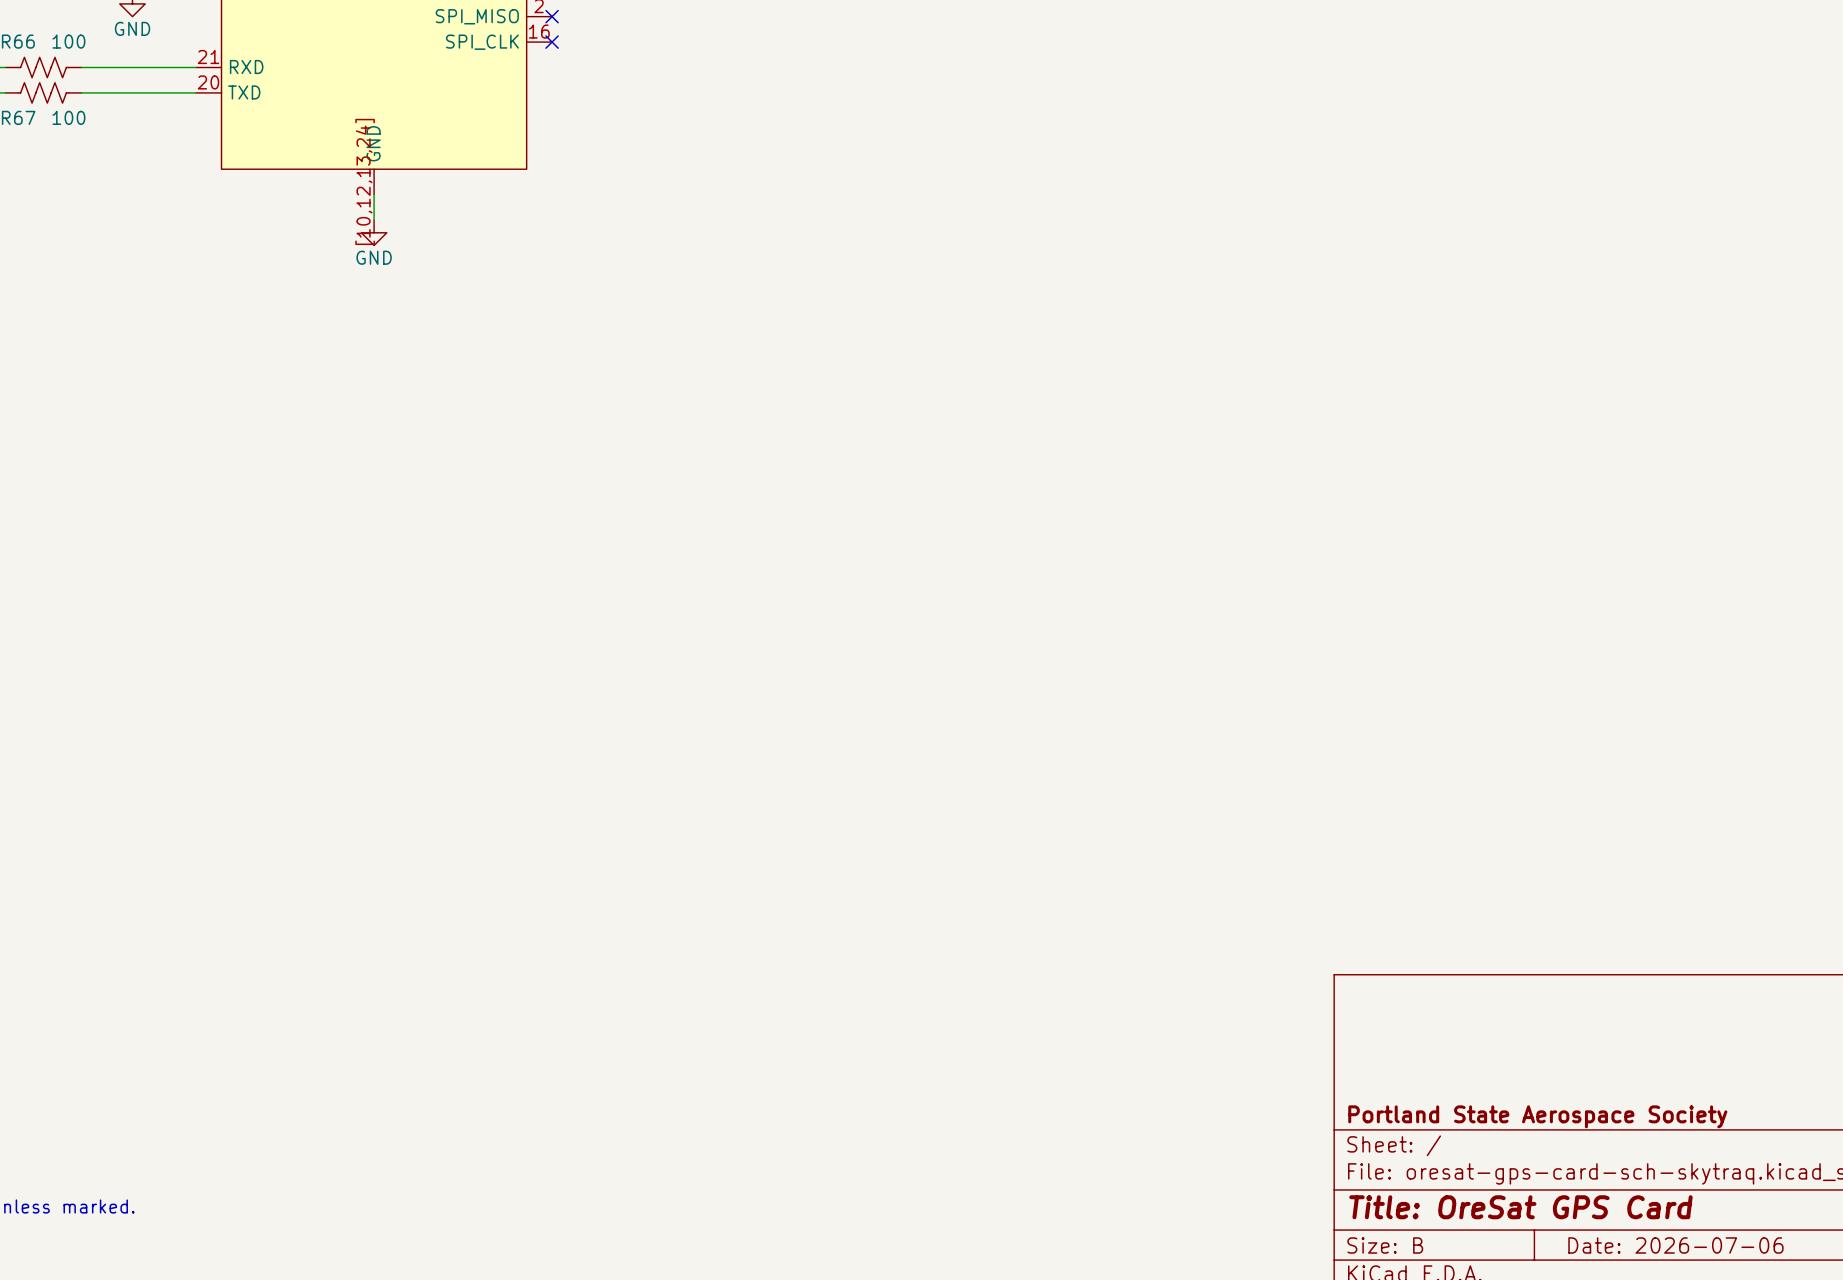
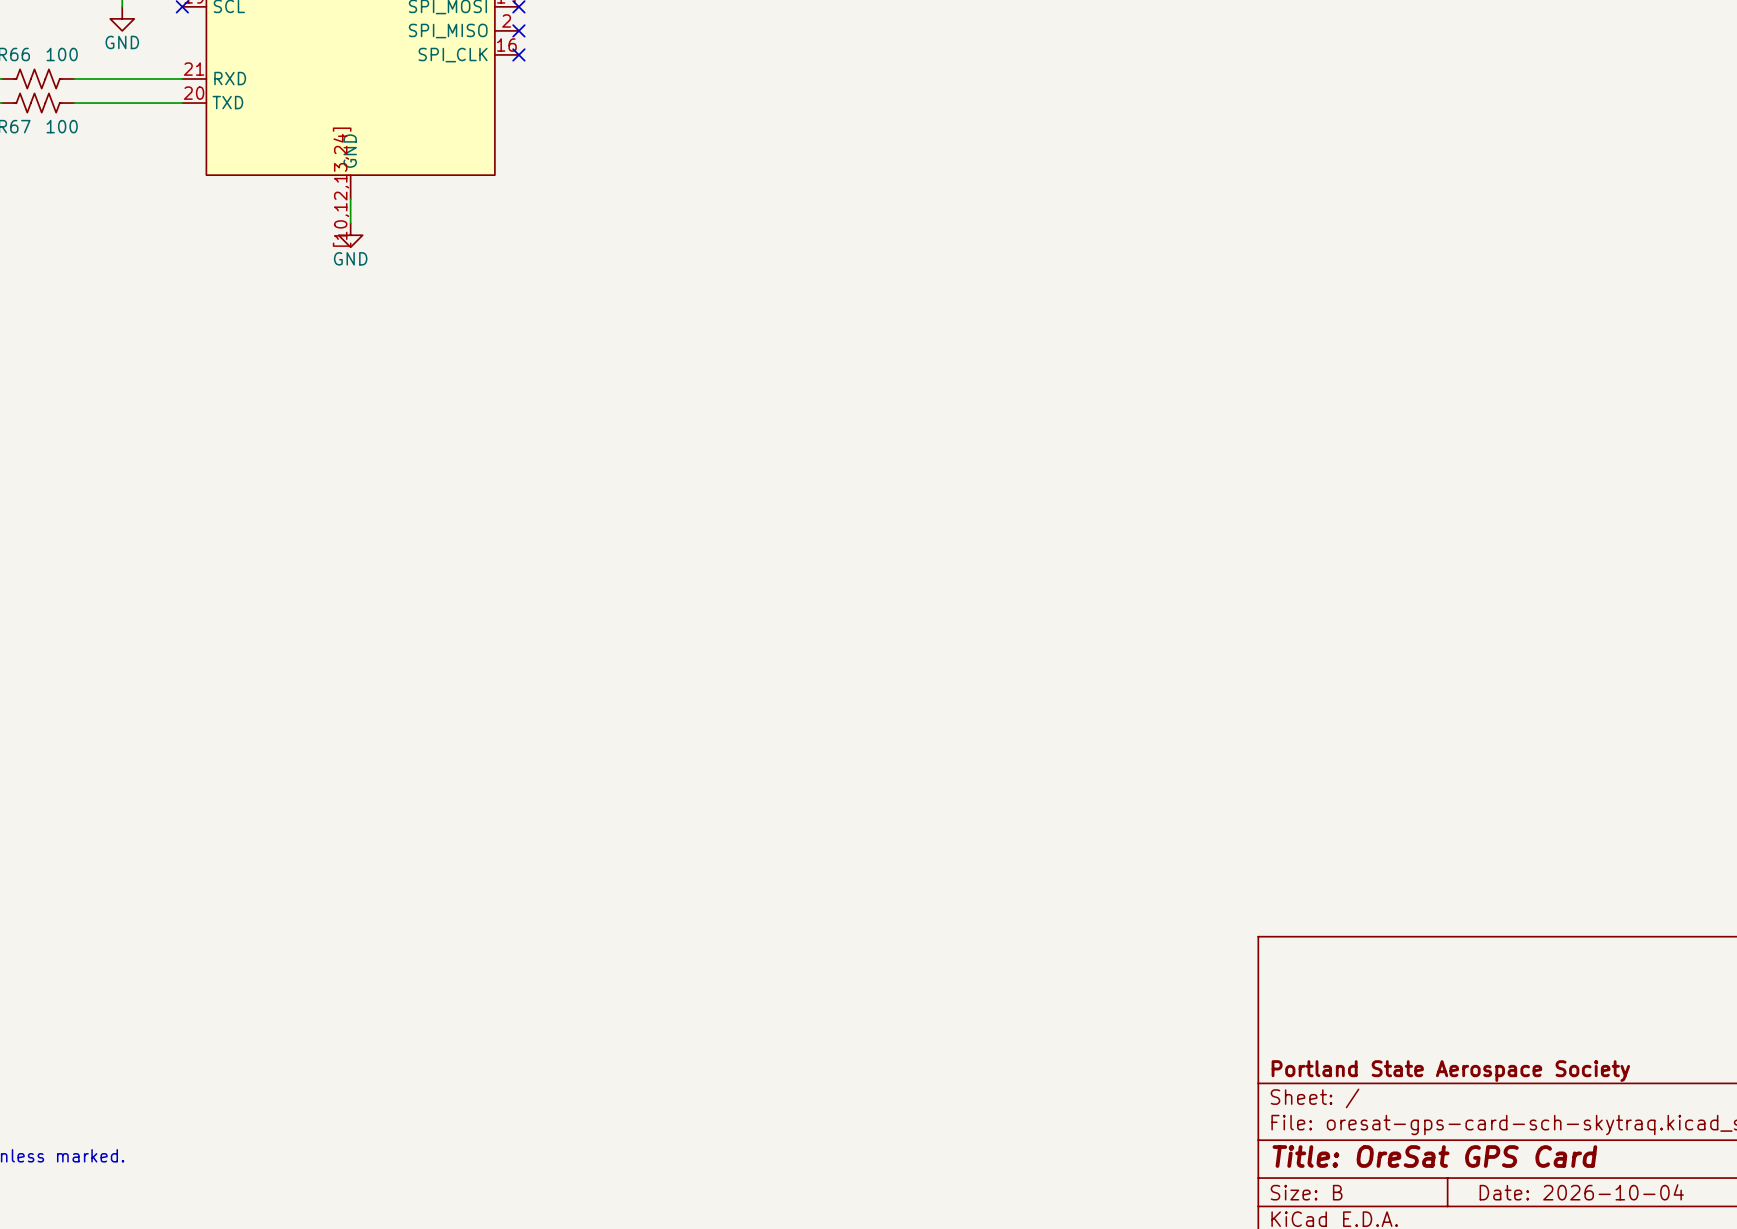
title block: Date: 2026-07-06 (1675, 1245) -> Date: 2026-10-04 (1581, 1192)

